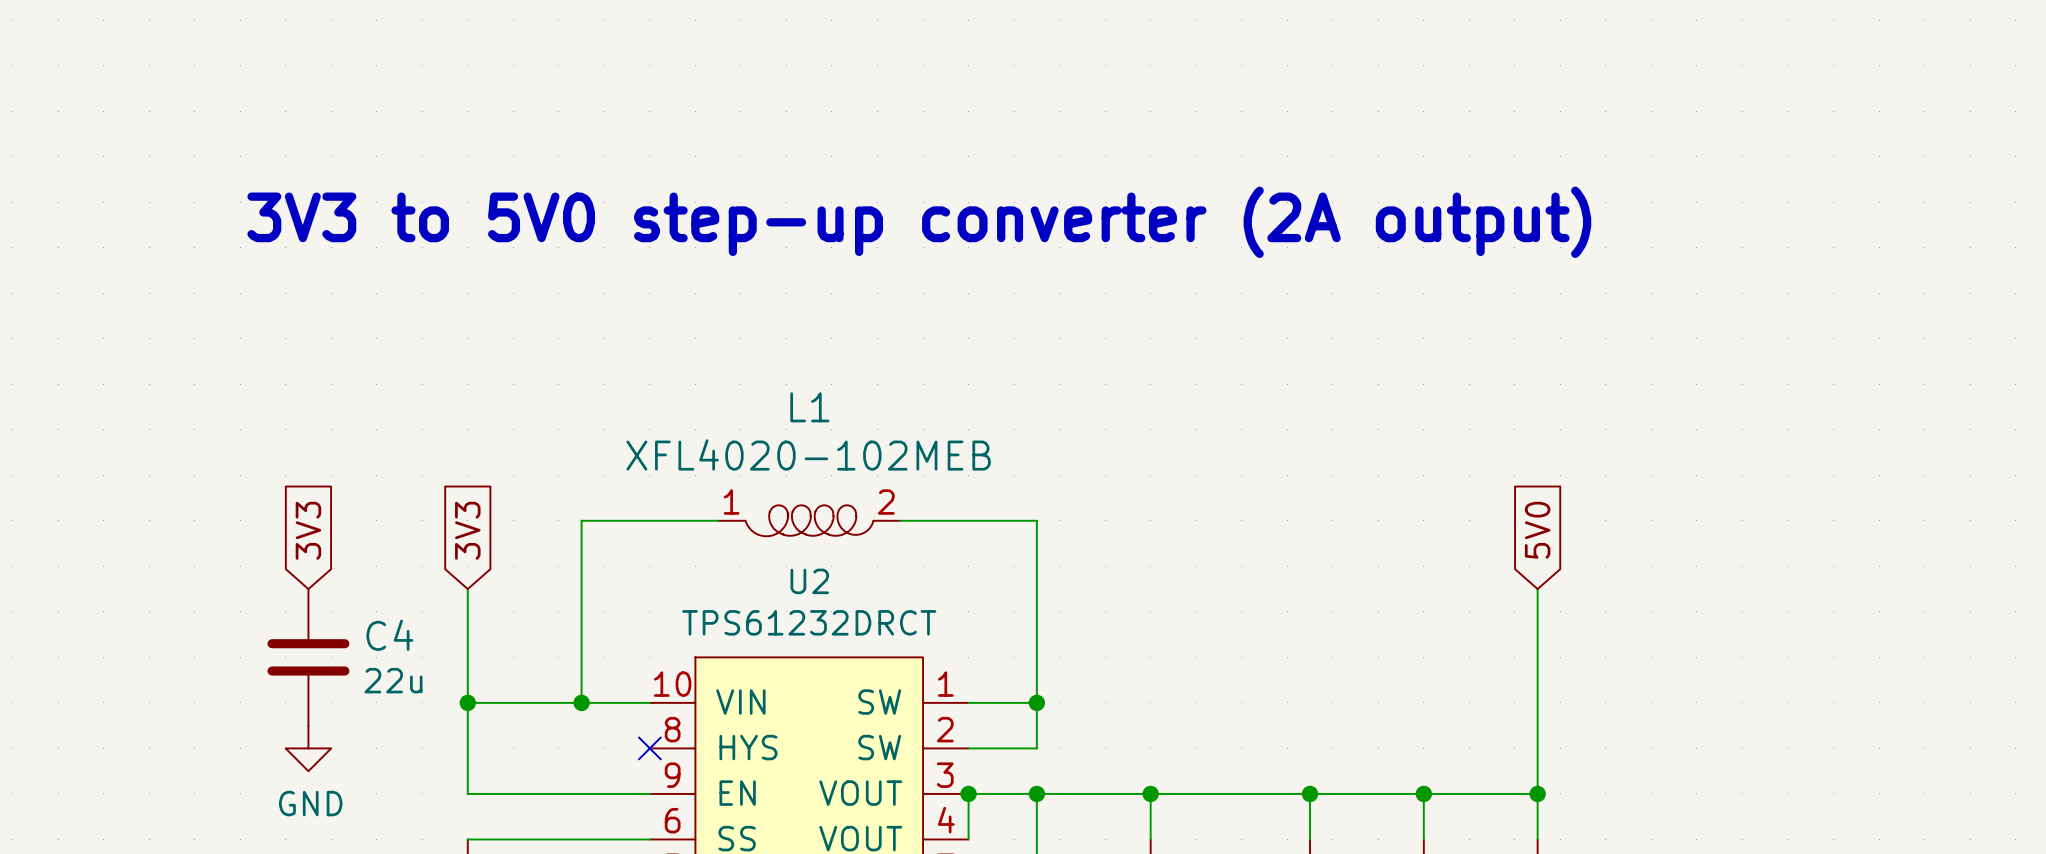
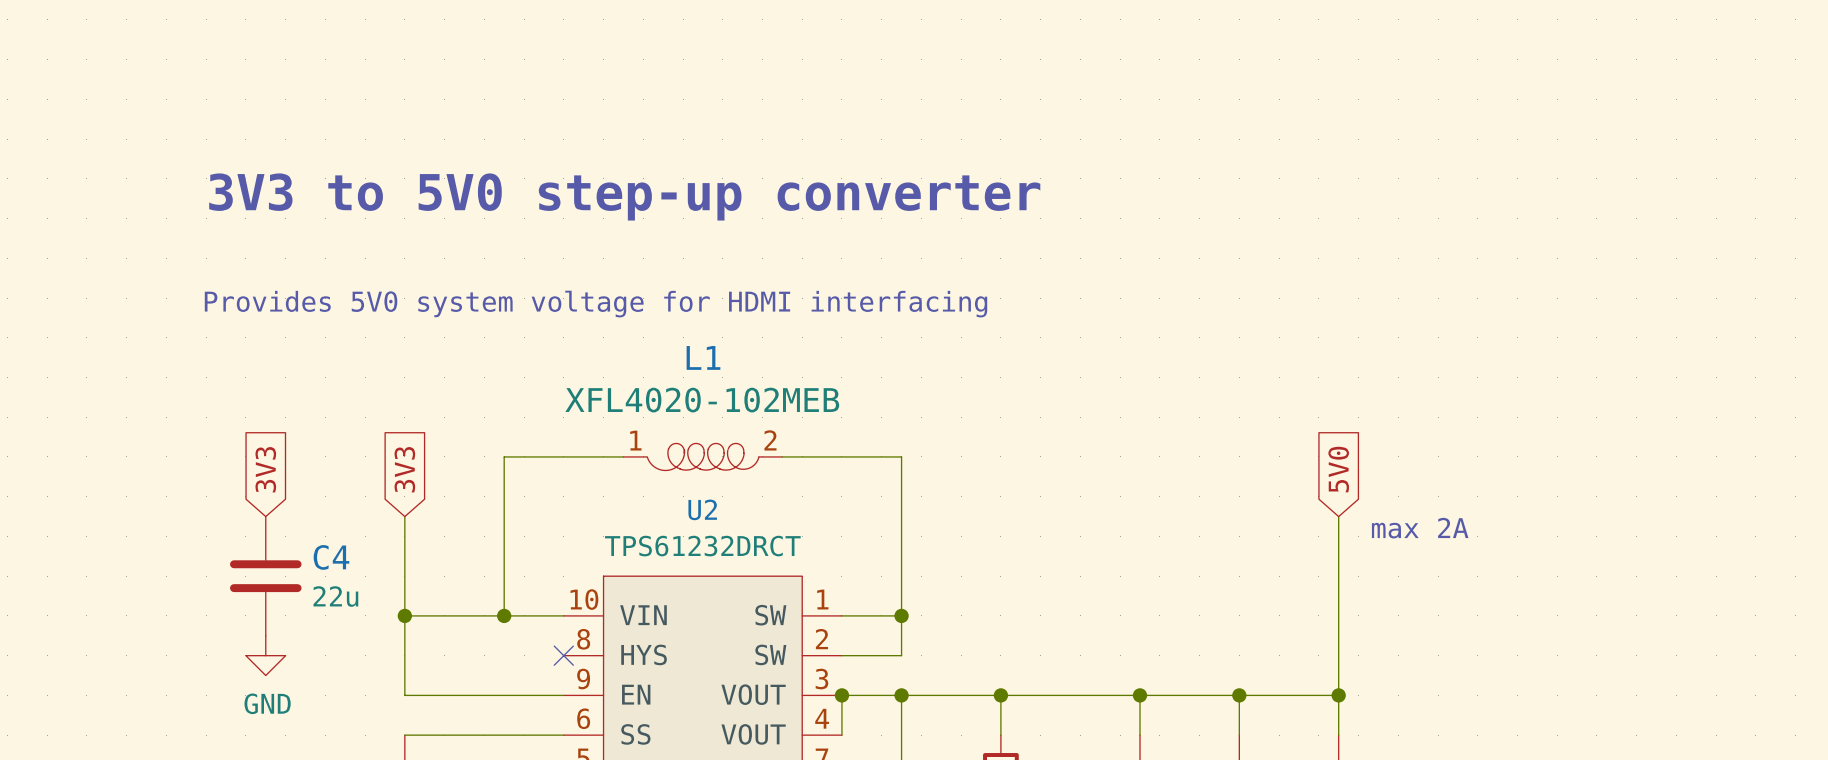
text: 3V3 to 5V0 step-up converter (2A output) (919, 222) -> 3V3 to 5V0 step-up converter (624, 196)
text: none -> Provides 5V0 system voltage for HDMI interfacing (596, 304)
text: none -> max 2A (1420, 528)

